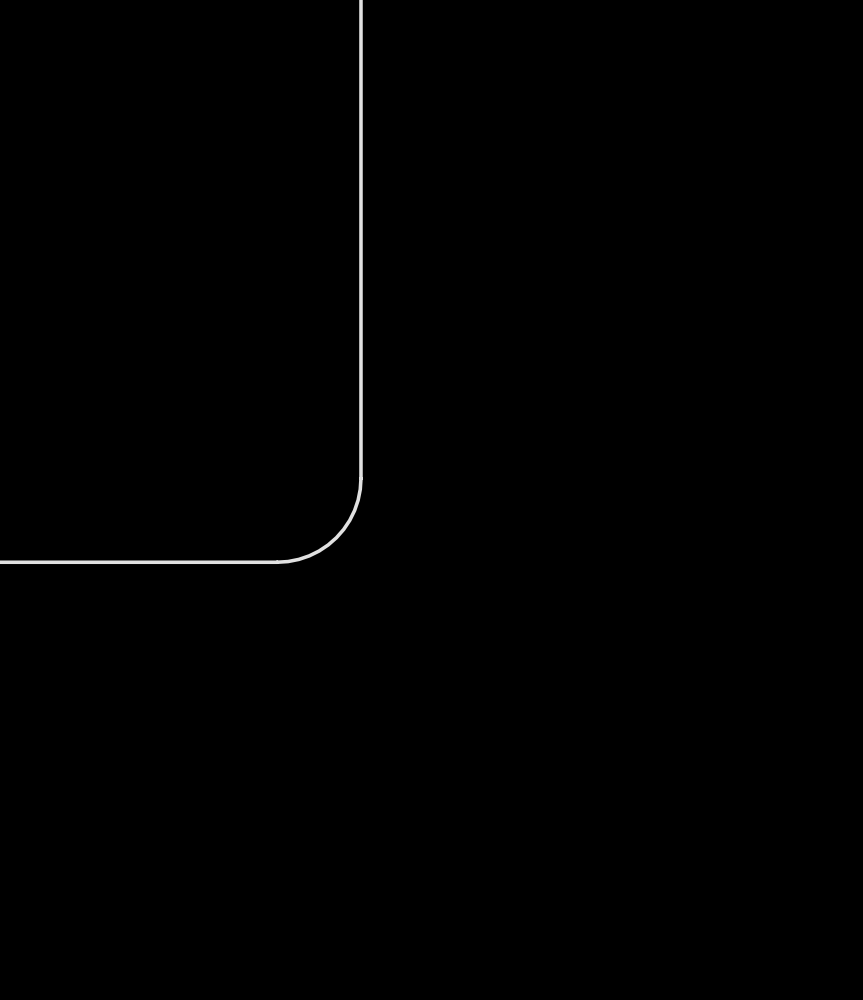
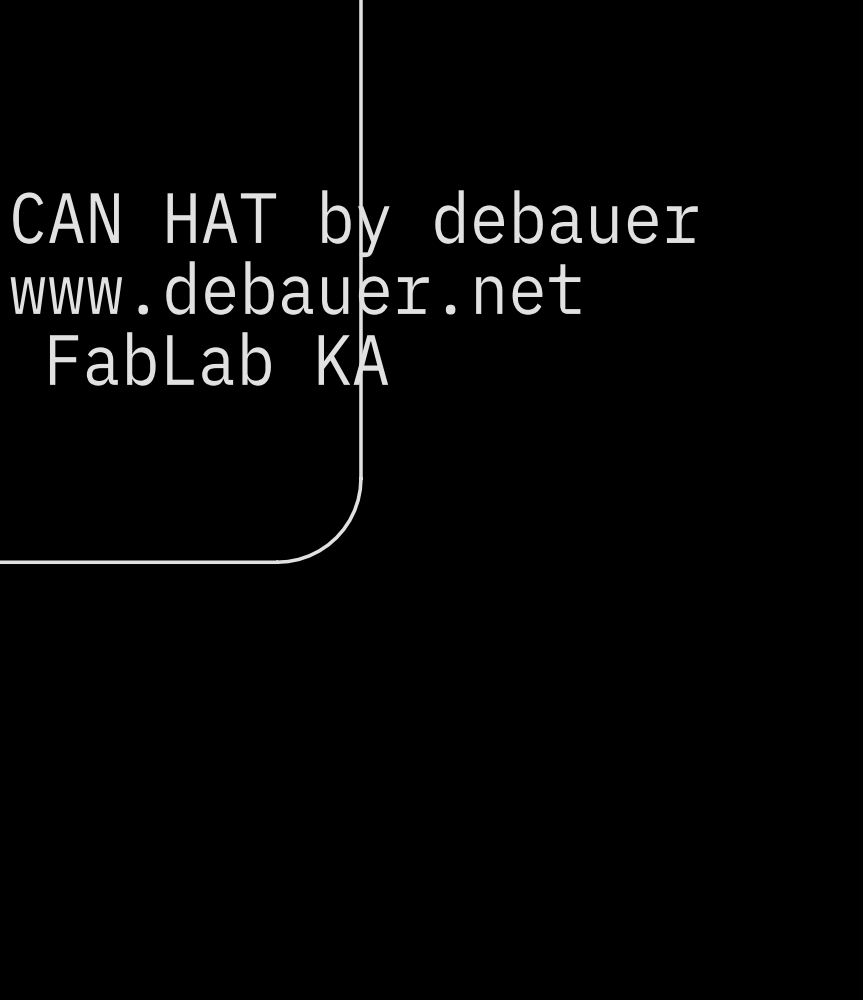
text: none -> CAN HAT by debauer (355, 223)
text: none -> www.debauer.net (295, 288)
text: none -> FabLab KA (219, 358)

